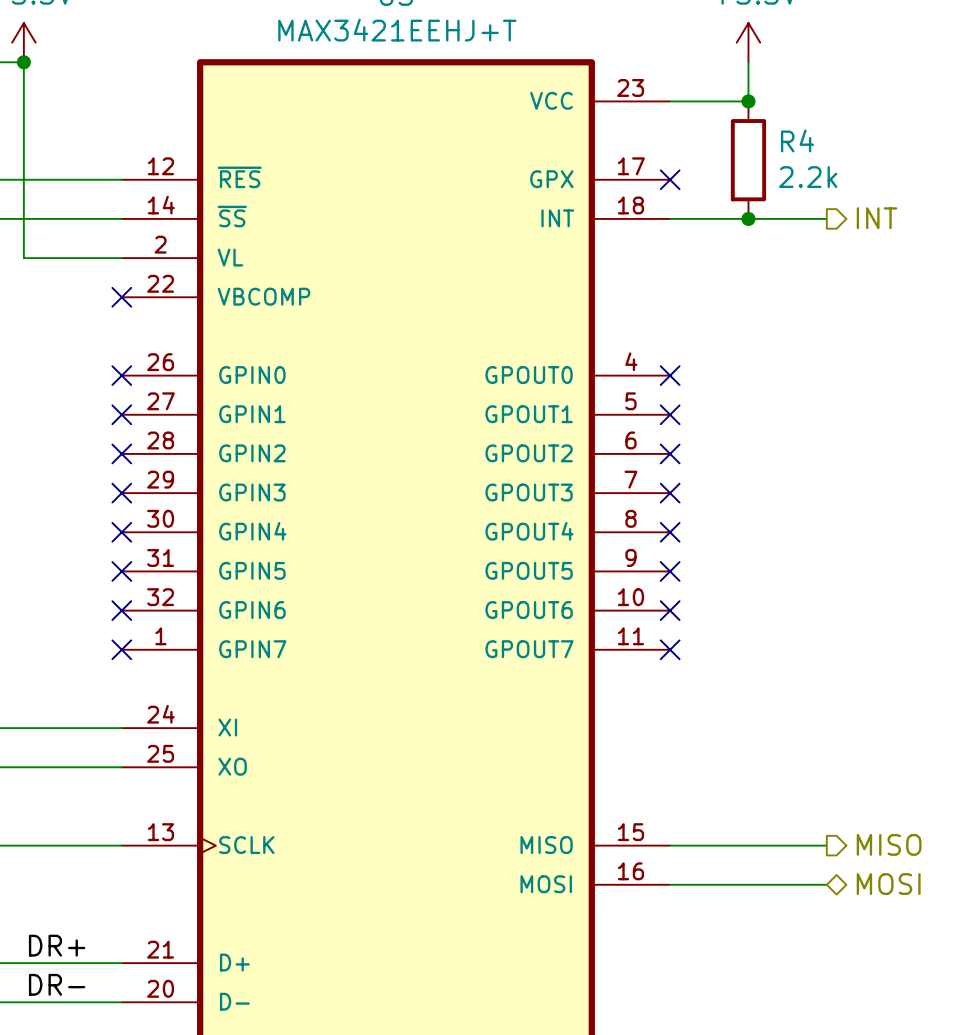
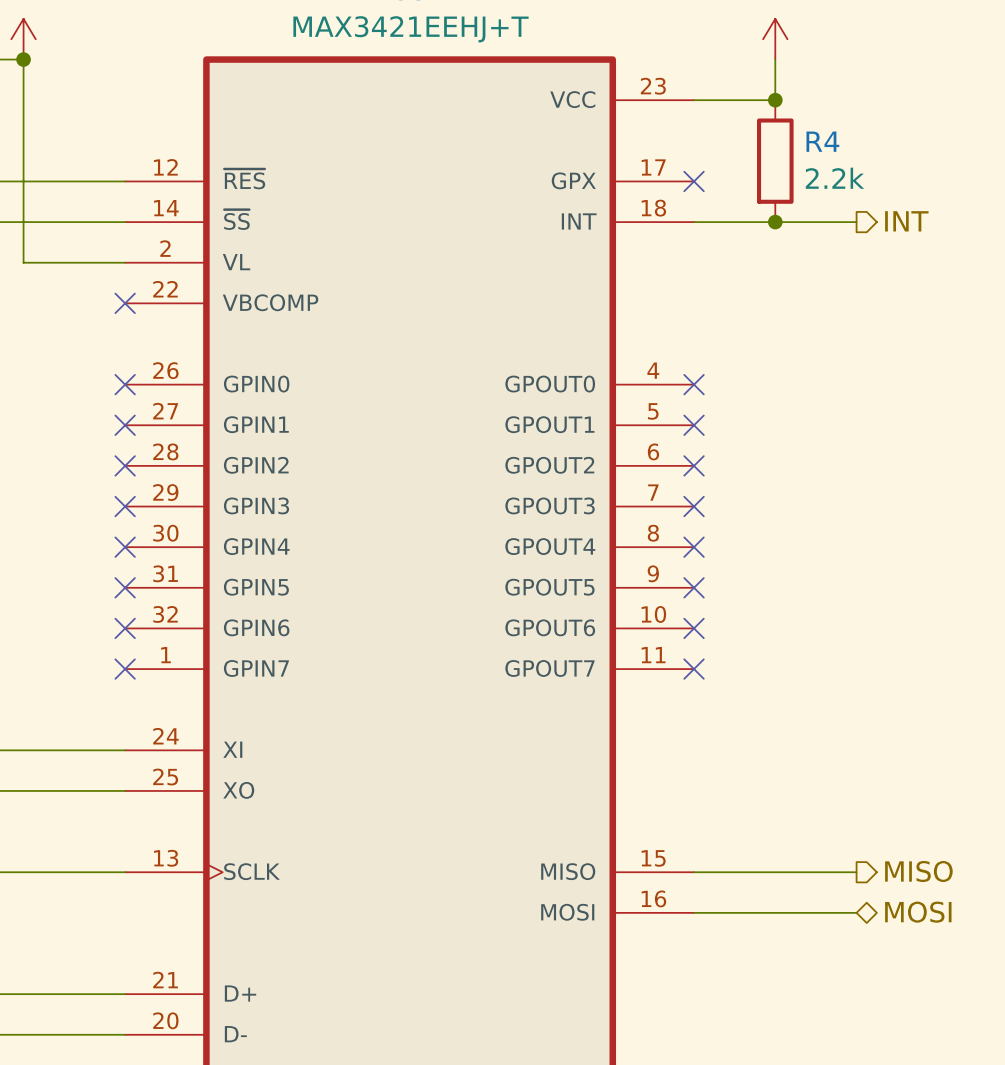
label: DR+ (57, 945) -> none
label: DR- (57, 984) -> none

